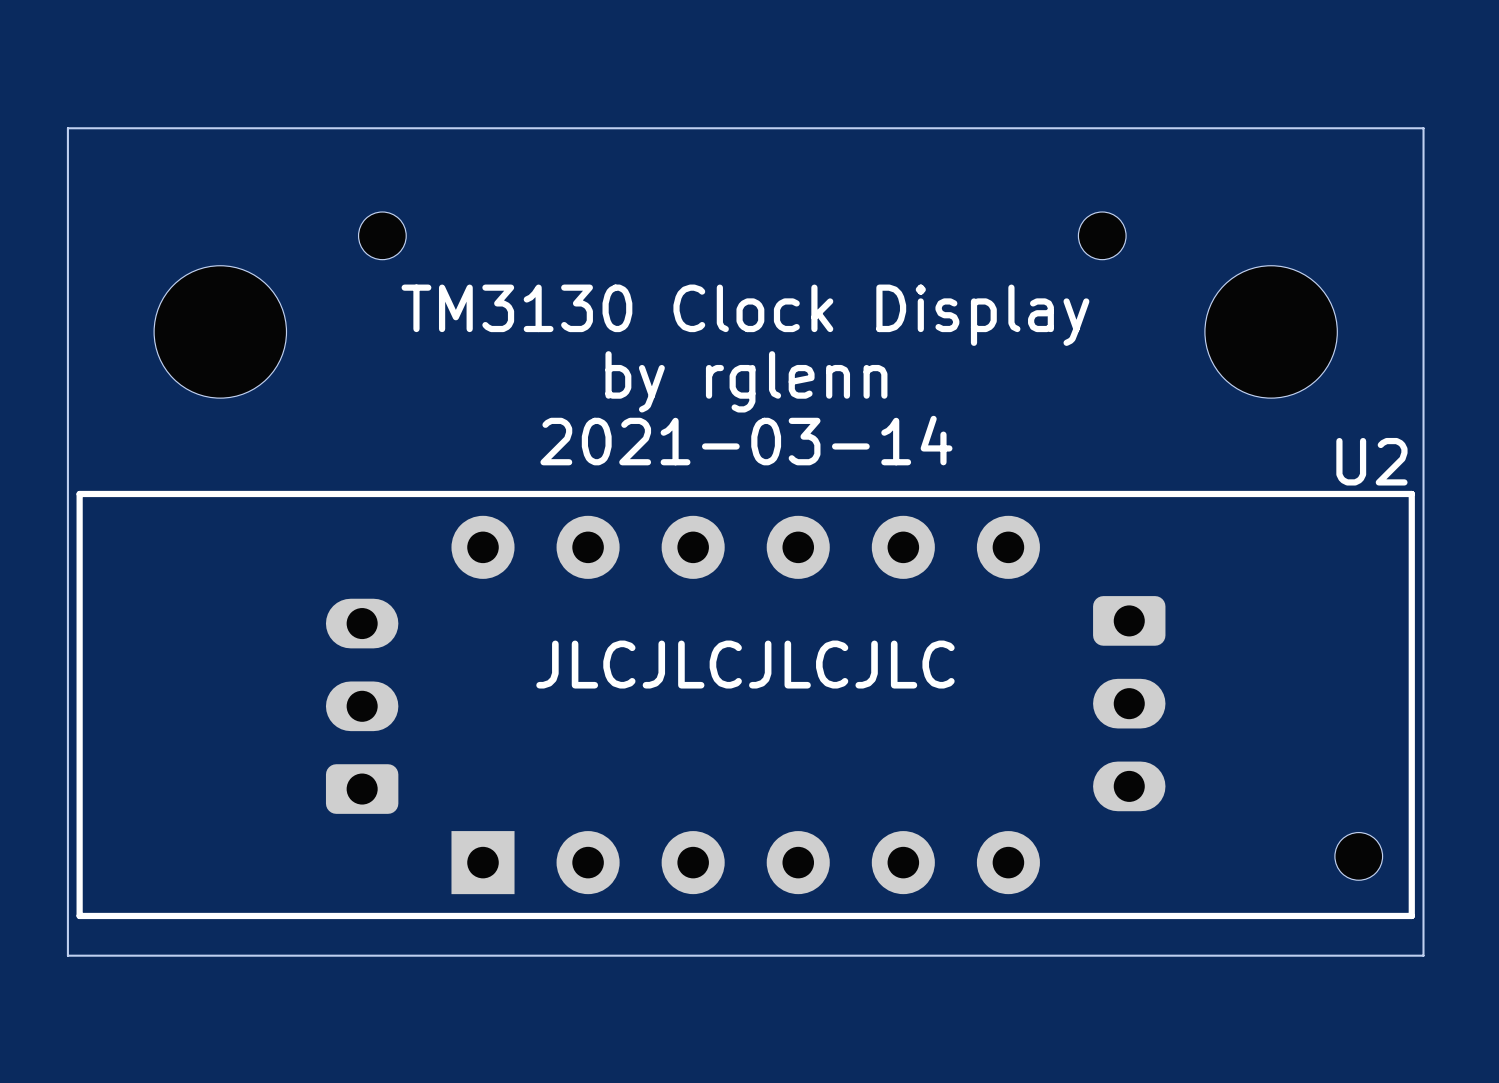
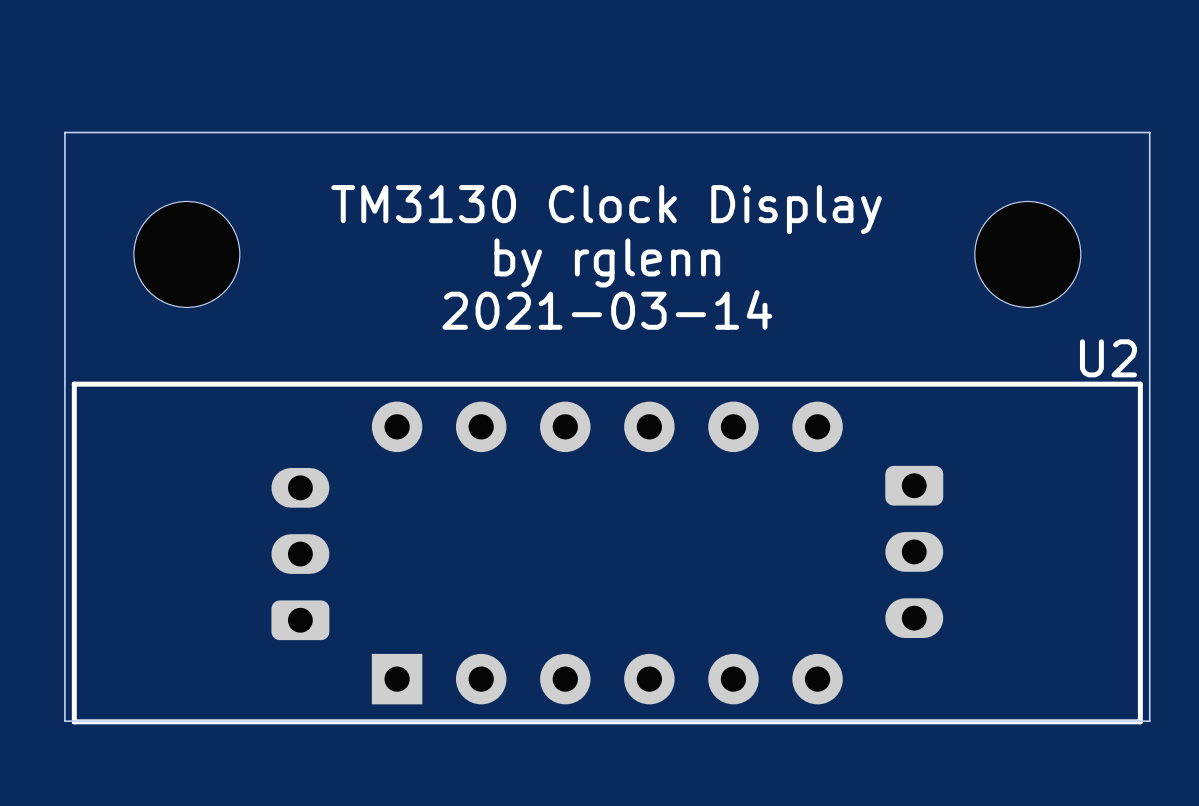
board edge: (67, 179) (67, 128) (1423, 128) (1423, 955) (67, 955) (67, 915) -> (64, 132) (1149, 132) (1149, 721) (64, 721)
part: (382, 235) -> none
part: (1102, 235) -> none
text position: TM3130 Clock Display (745, 315) -> TM3130 Clock Display (606, 209)
text position: by rglenn (746, 381) -> by rglenn (607, 262)
text position: 2021-03-14 (746, 440) -> 2021-03-14 (607, 309)
text: JLCJLCJLCJLC (745, 664) -> none
part: (1358, 856) -> none

